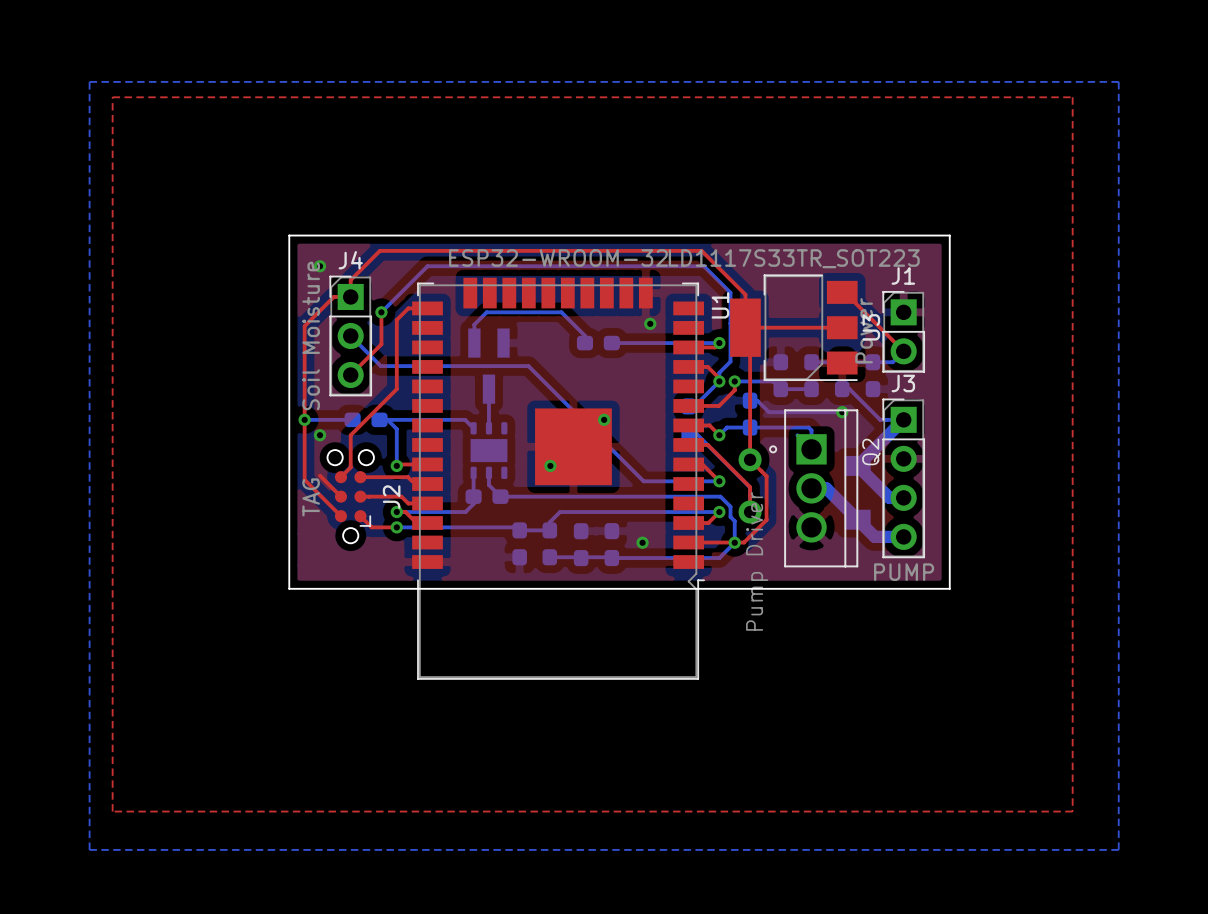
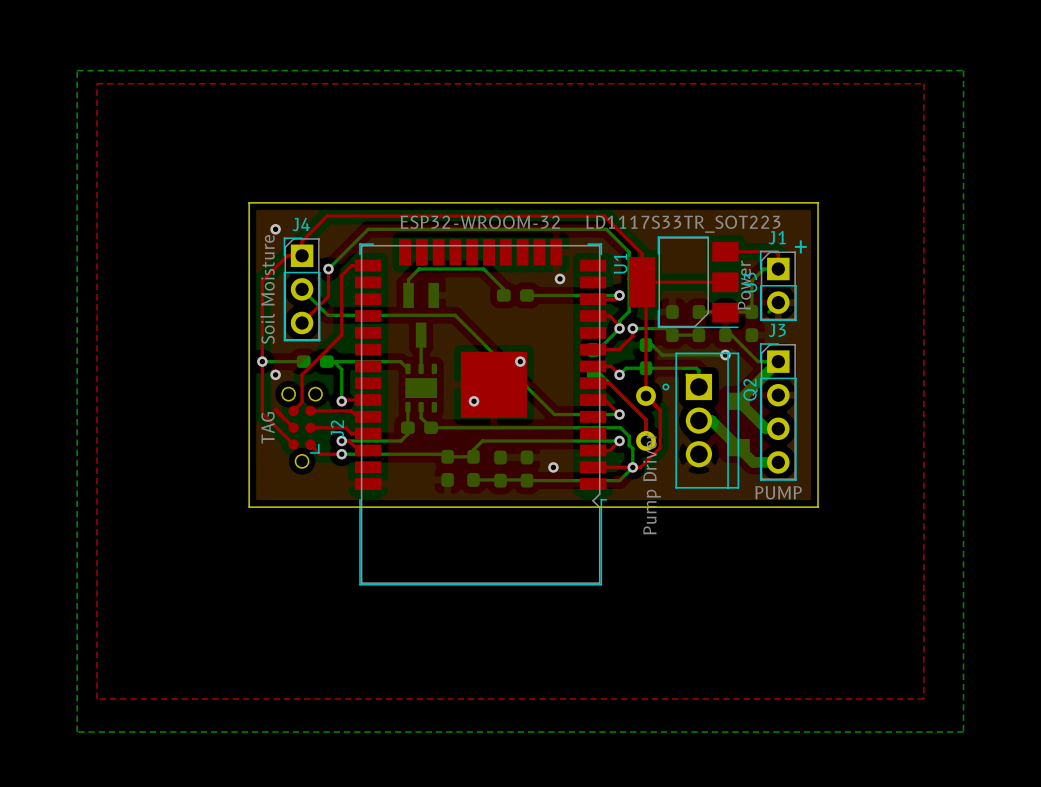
text: none -> + (800, 246)
top track: (844, 292) (903, 351) -> (727, 251) (775, 251) (778, 254) (778, 269)
bottom track: (872, 362) (892, 362) -> (751, 311) (751, 280) (763, 269) (778, 269)

